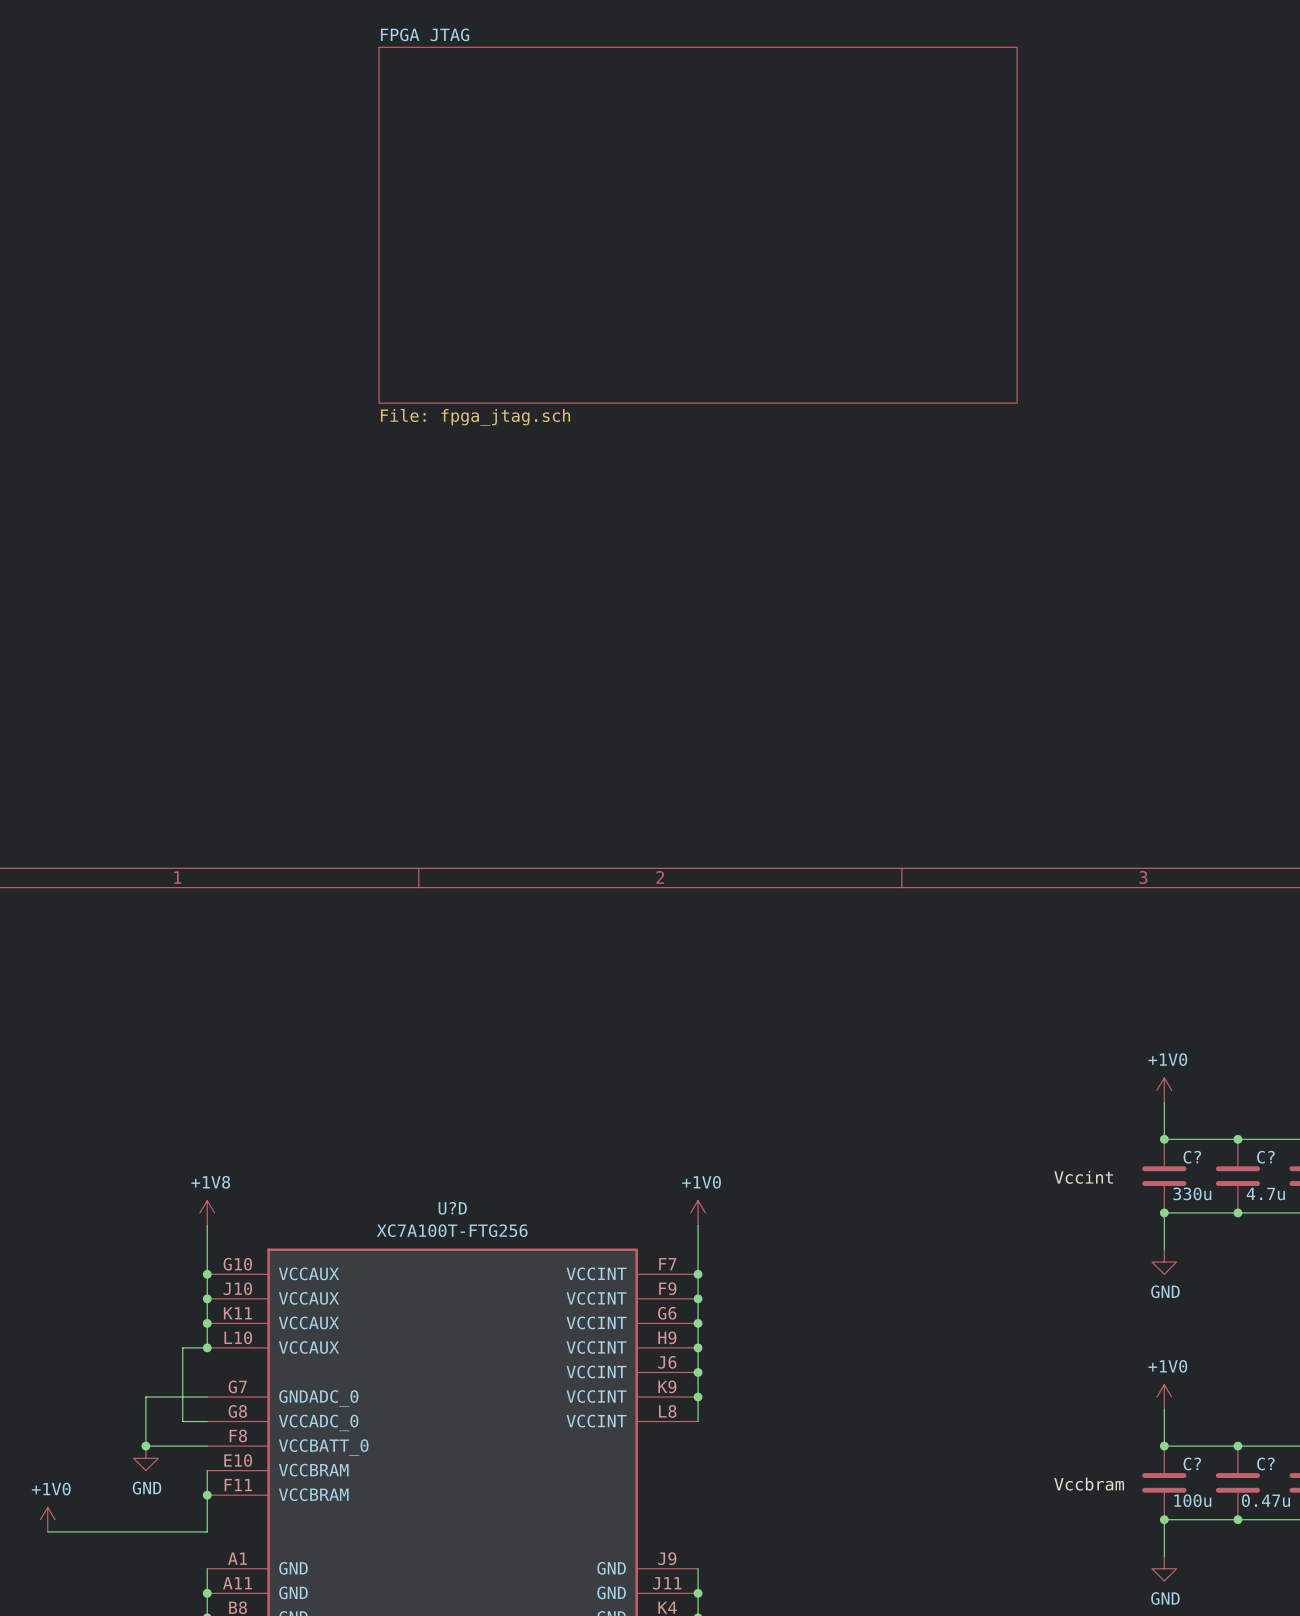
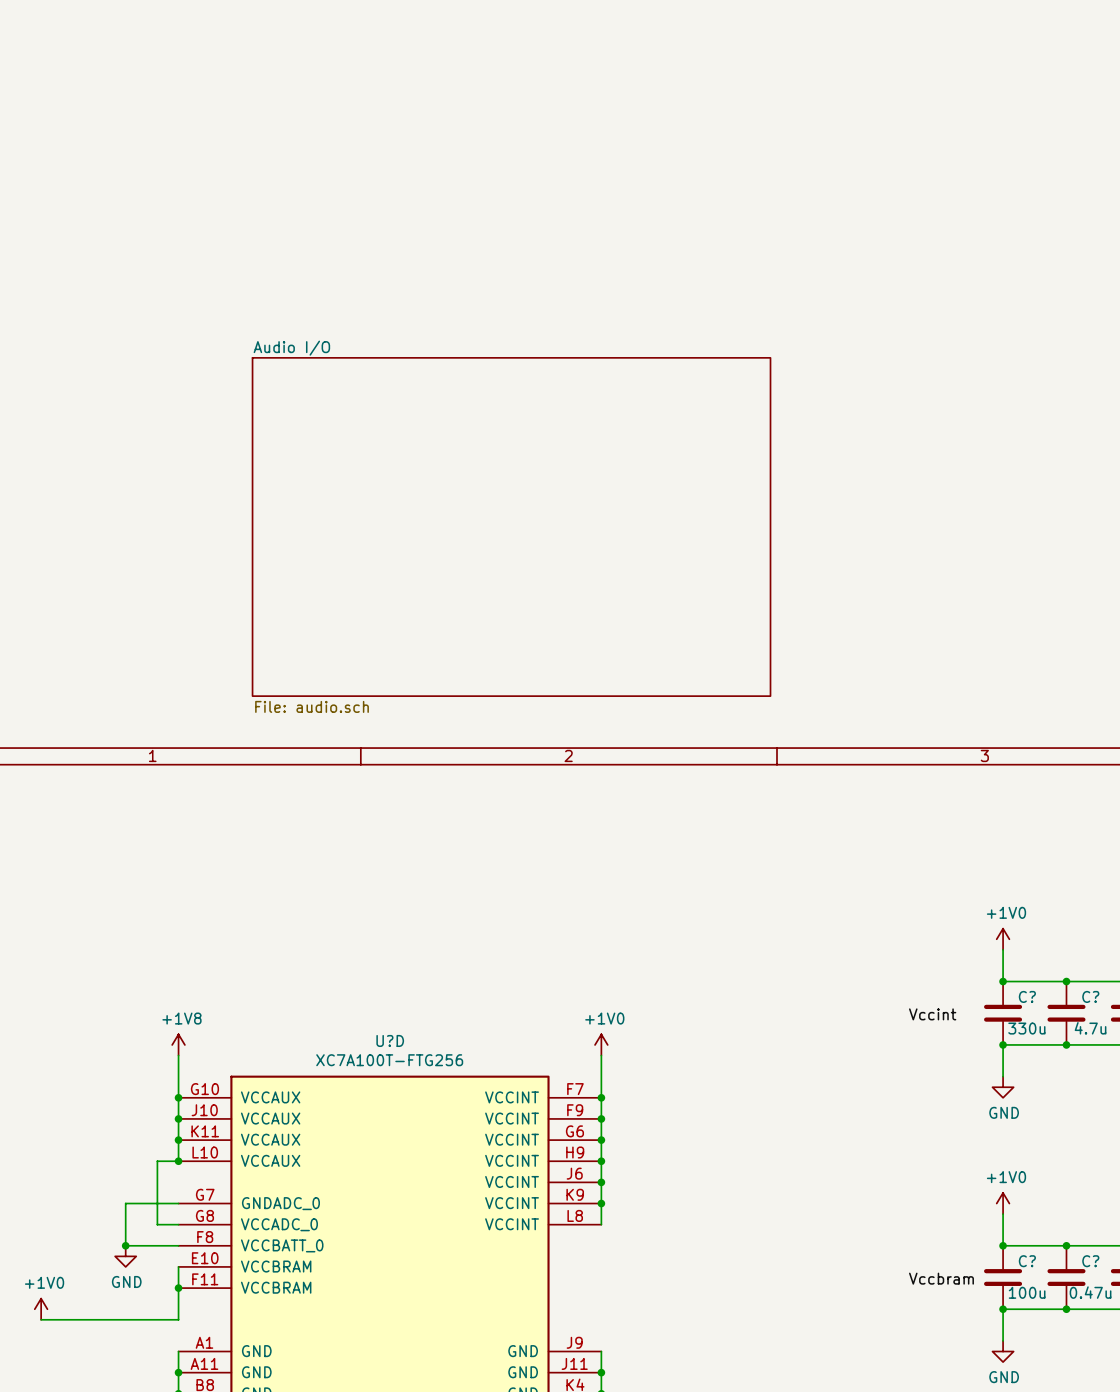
sheet FPGA JTAG: File: fpga_jtag.sch (698, 225) -> none
sheet Audio I/O: none -> File: audio.sch (511, 526)

